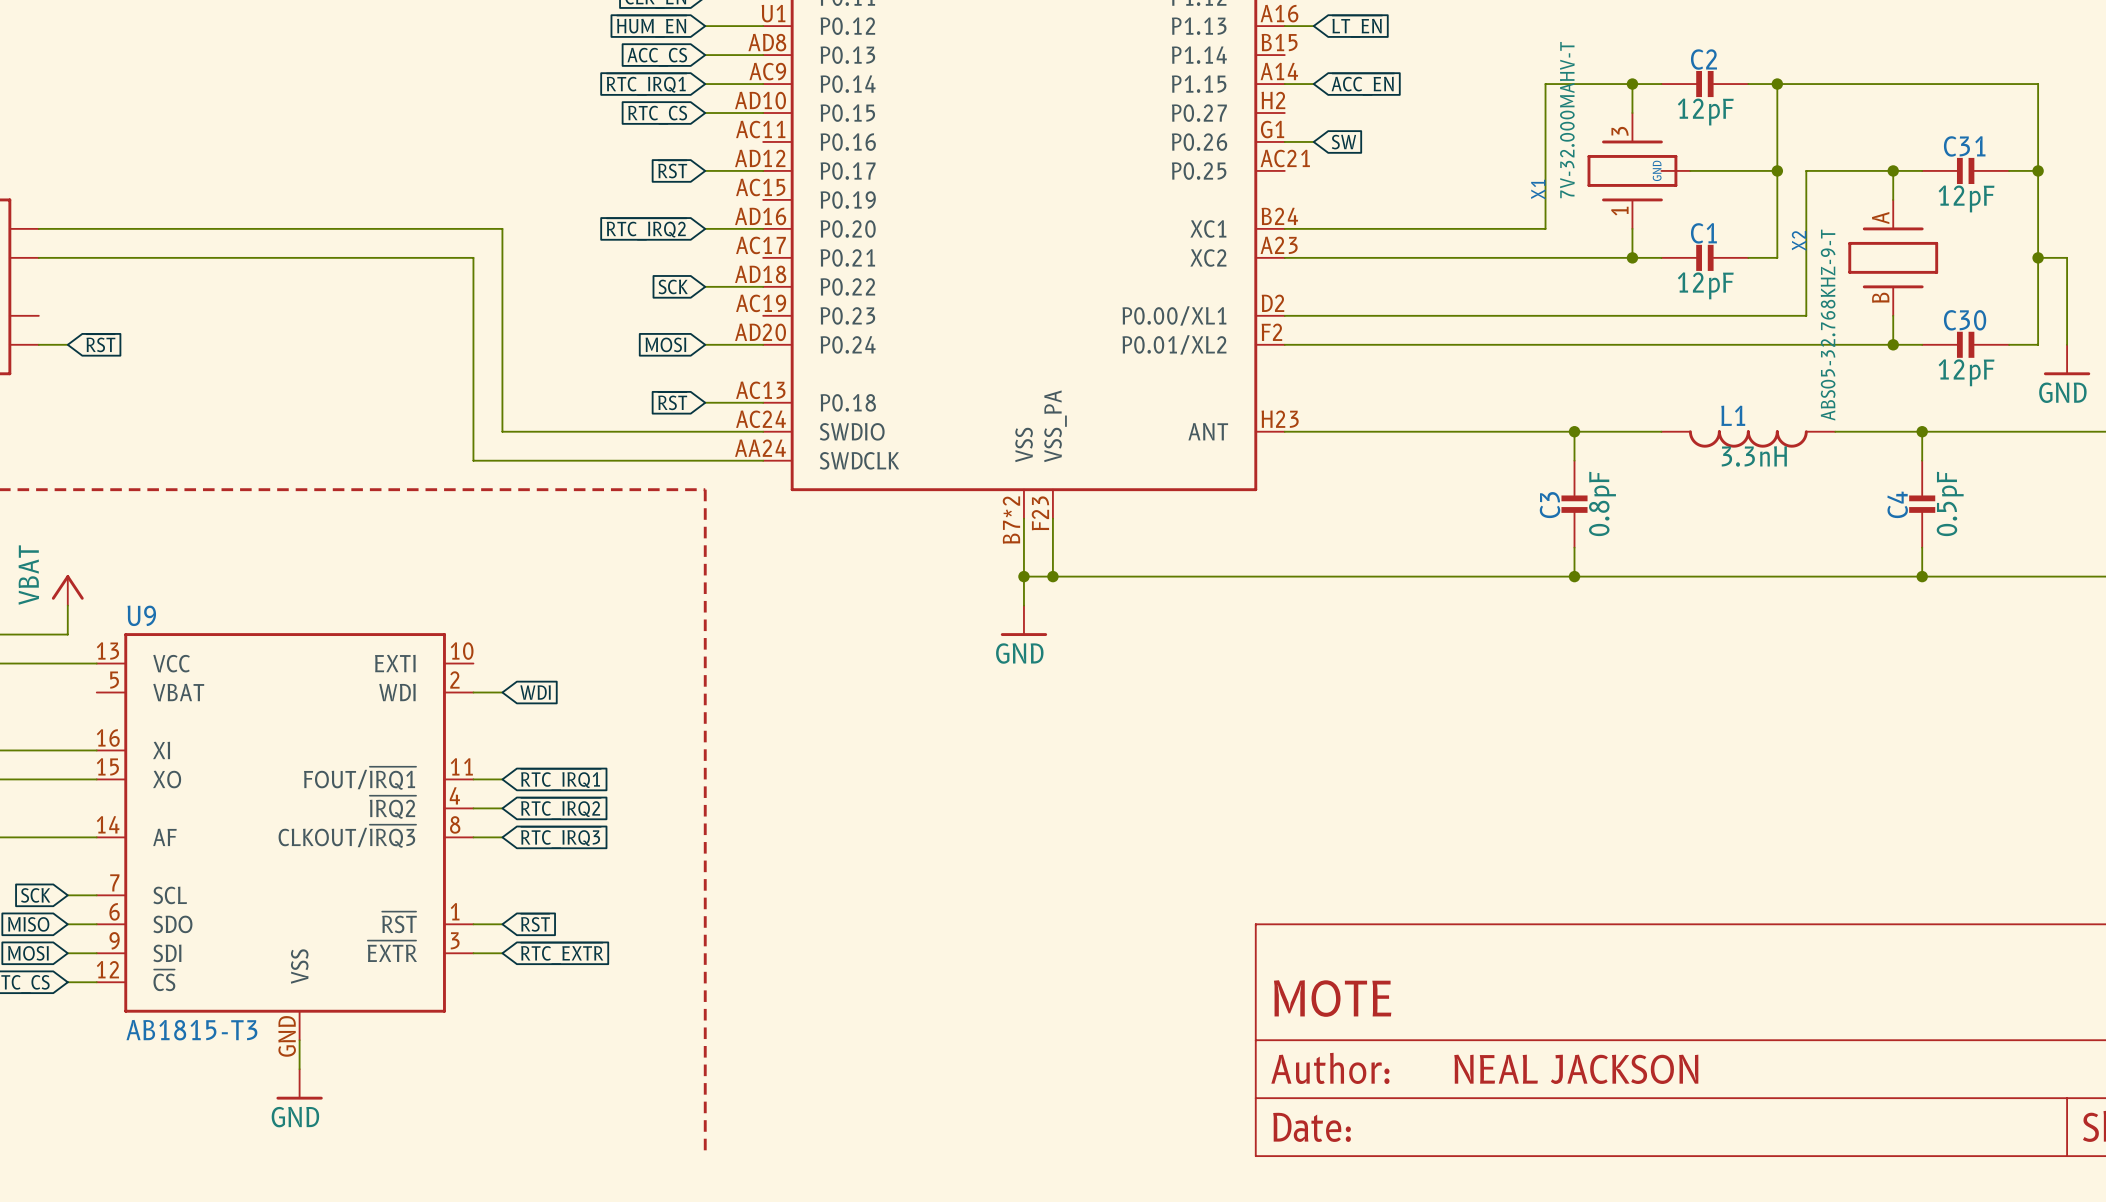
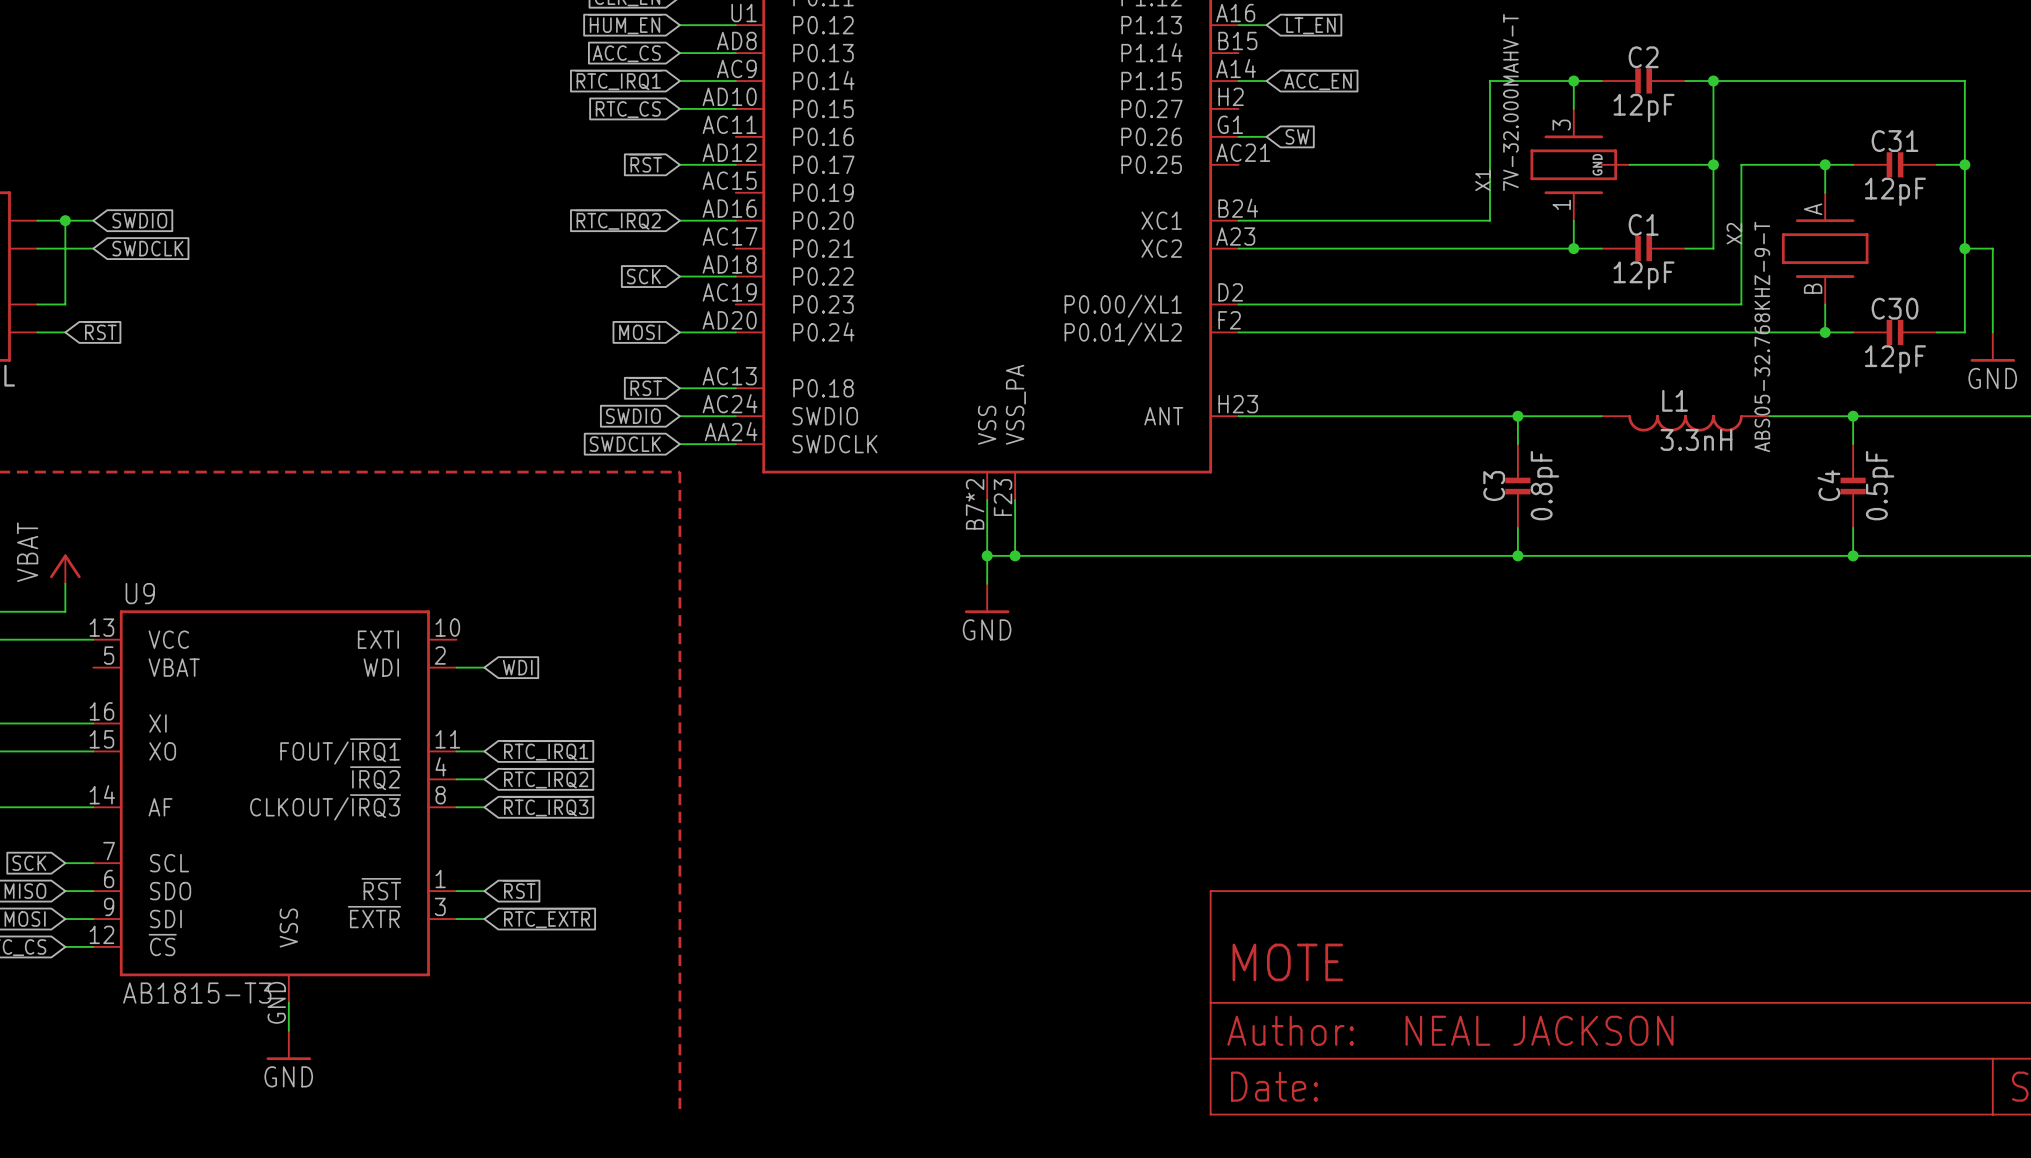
wire: none -> (65, 220) (65, 304) (37, 304)
junction: none -> (65, 220)
wire: (96, 228) (502, 228) (502, 431) (705, 431) -> none
global label: none -> SWDIO (139, 220)
wire: (96, 257) (473, 257) (473, 460) (705, 460) -> none
global label: none -> SWDCLK (147, 248)
global label: none -> SWDIO (633, 416)
global label: none -> SWDCLK (625, 444)

